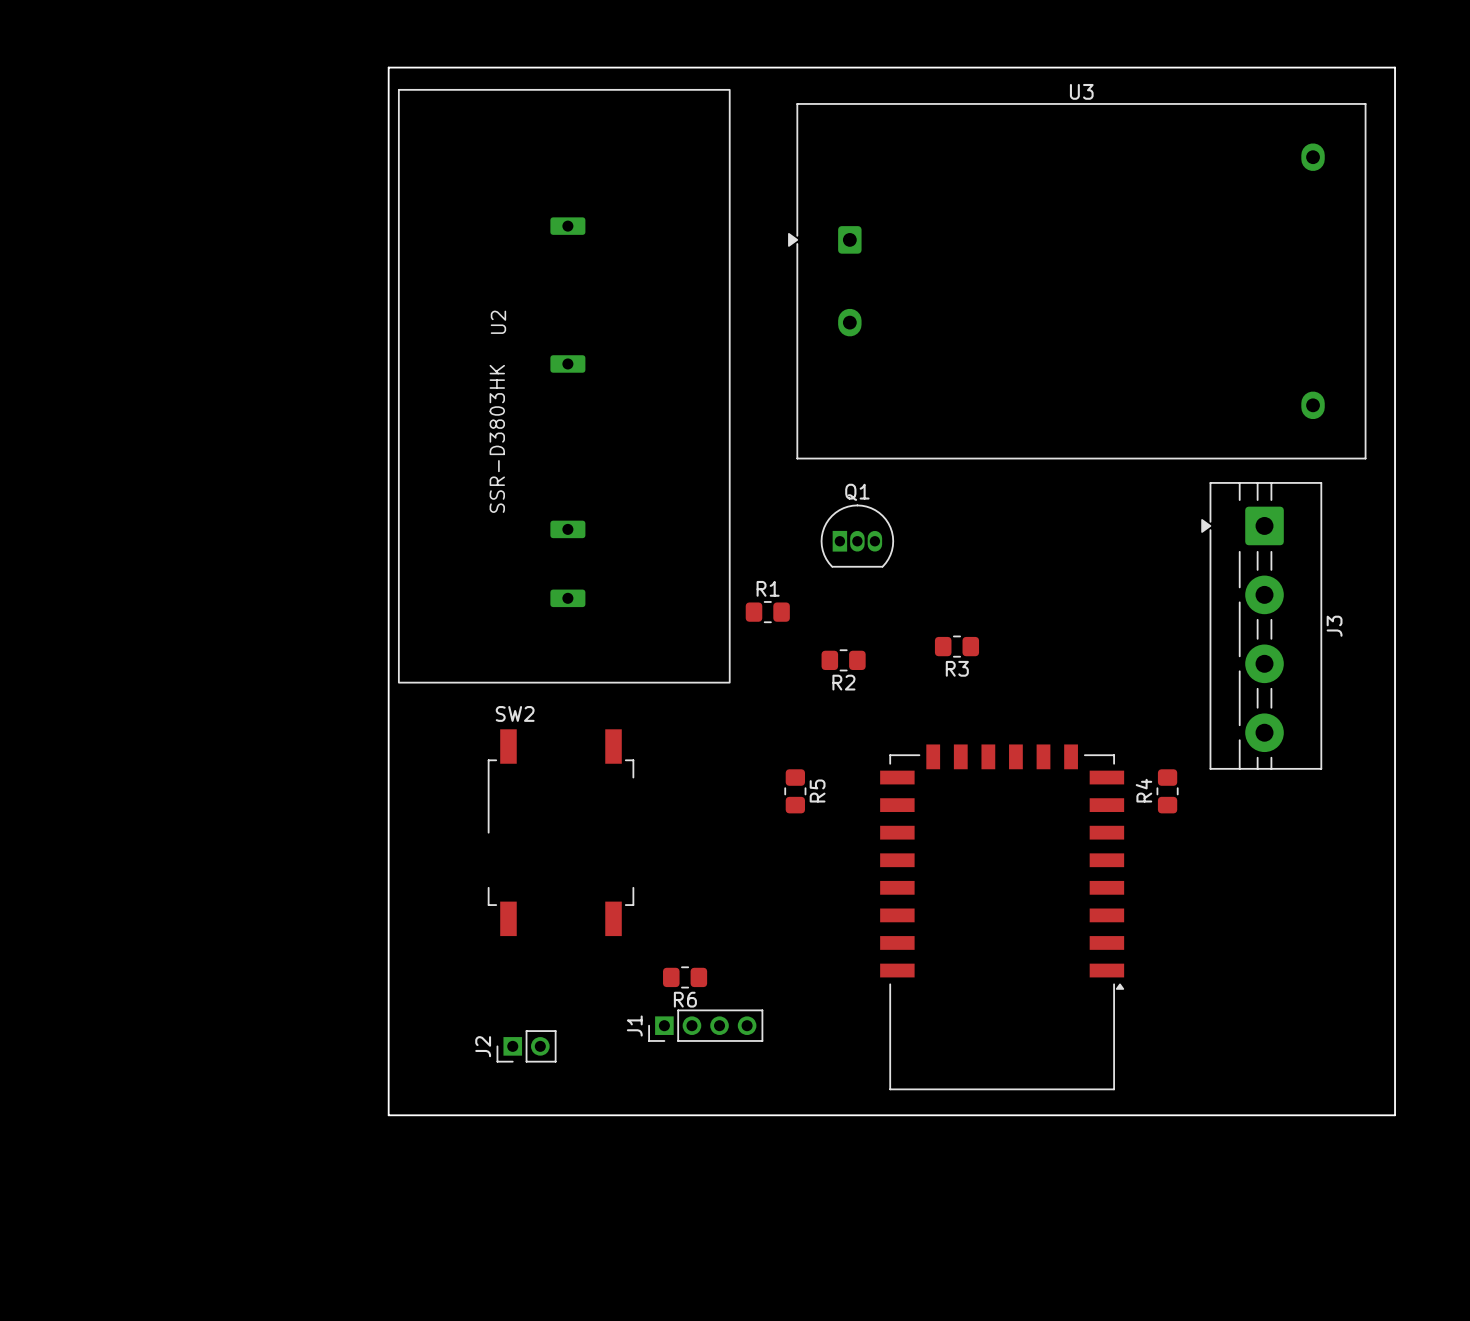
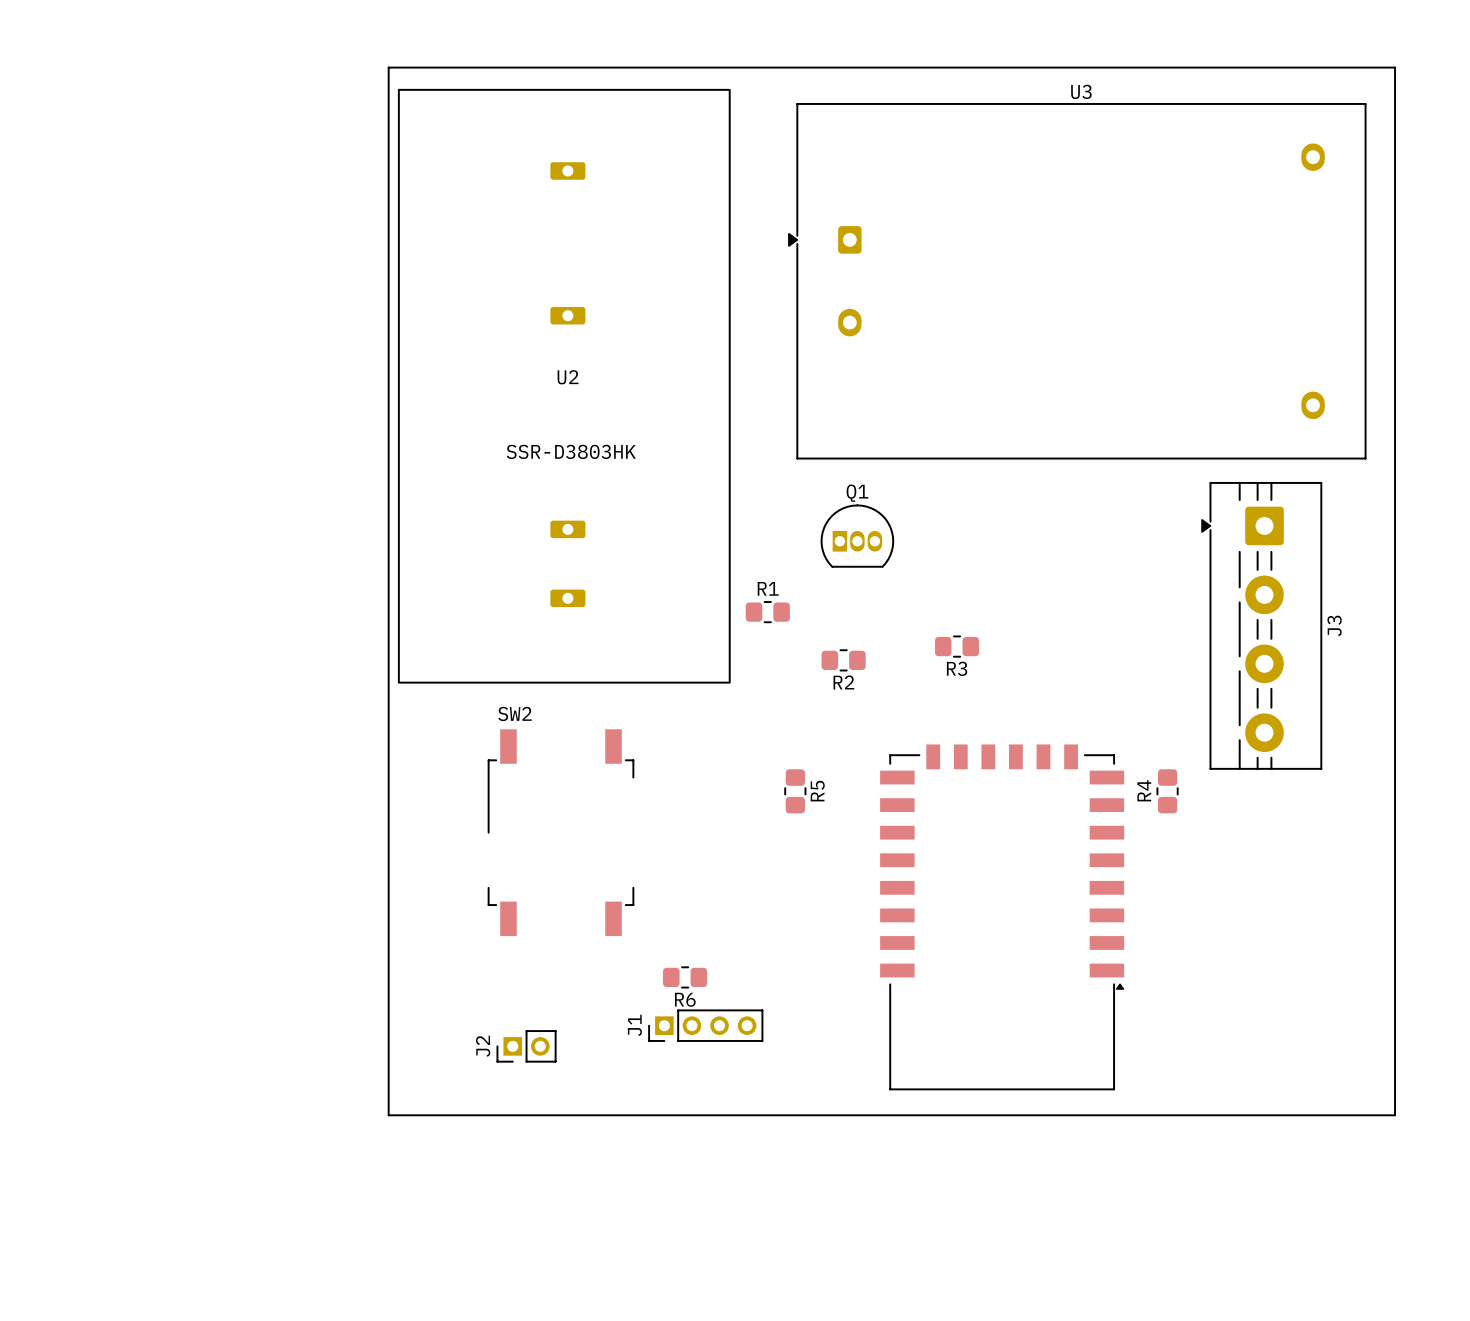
U2 footprint: [398, 89, 731, 684] -> [398, 89, 731, 684]
U2 name position: U2 (498, 322) -> U2 (568, 377)

